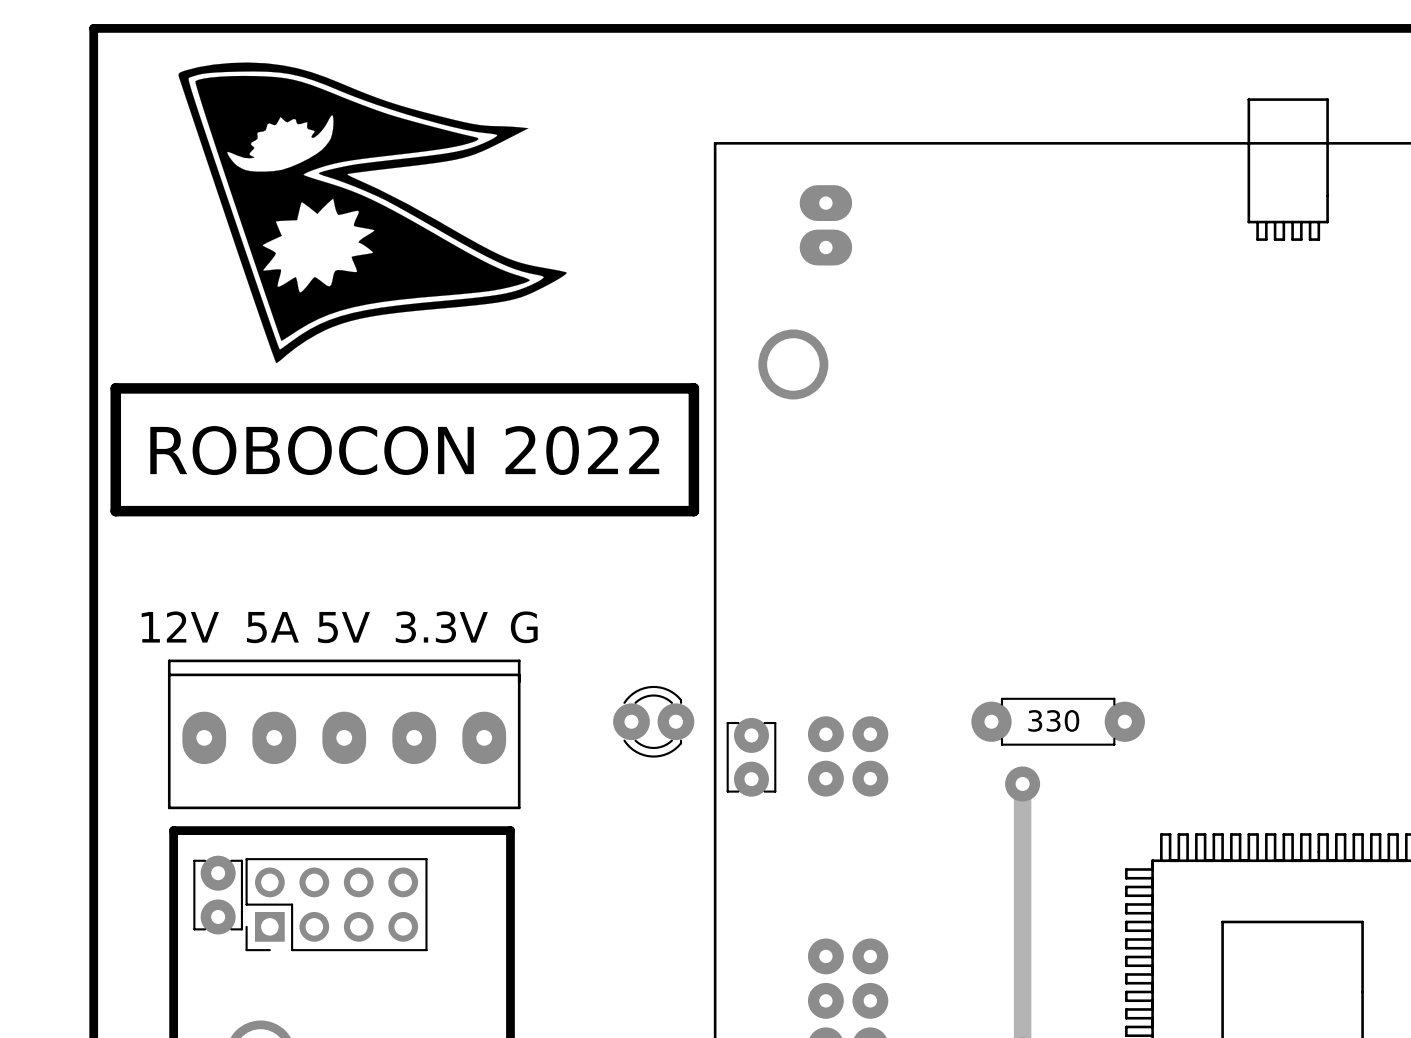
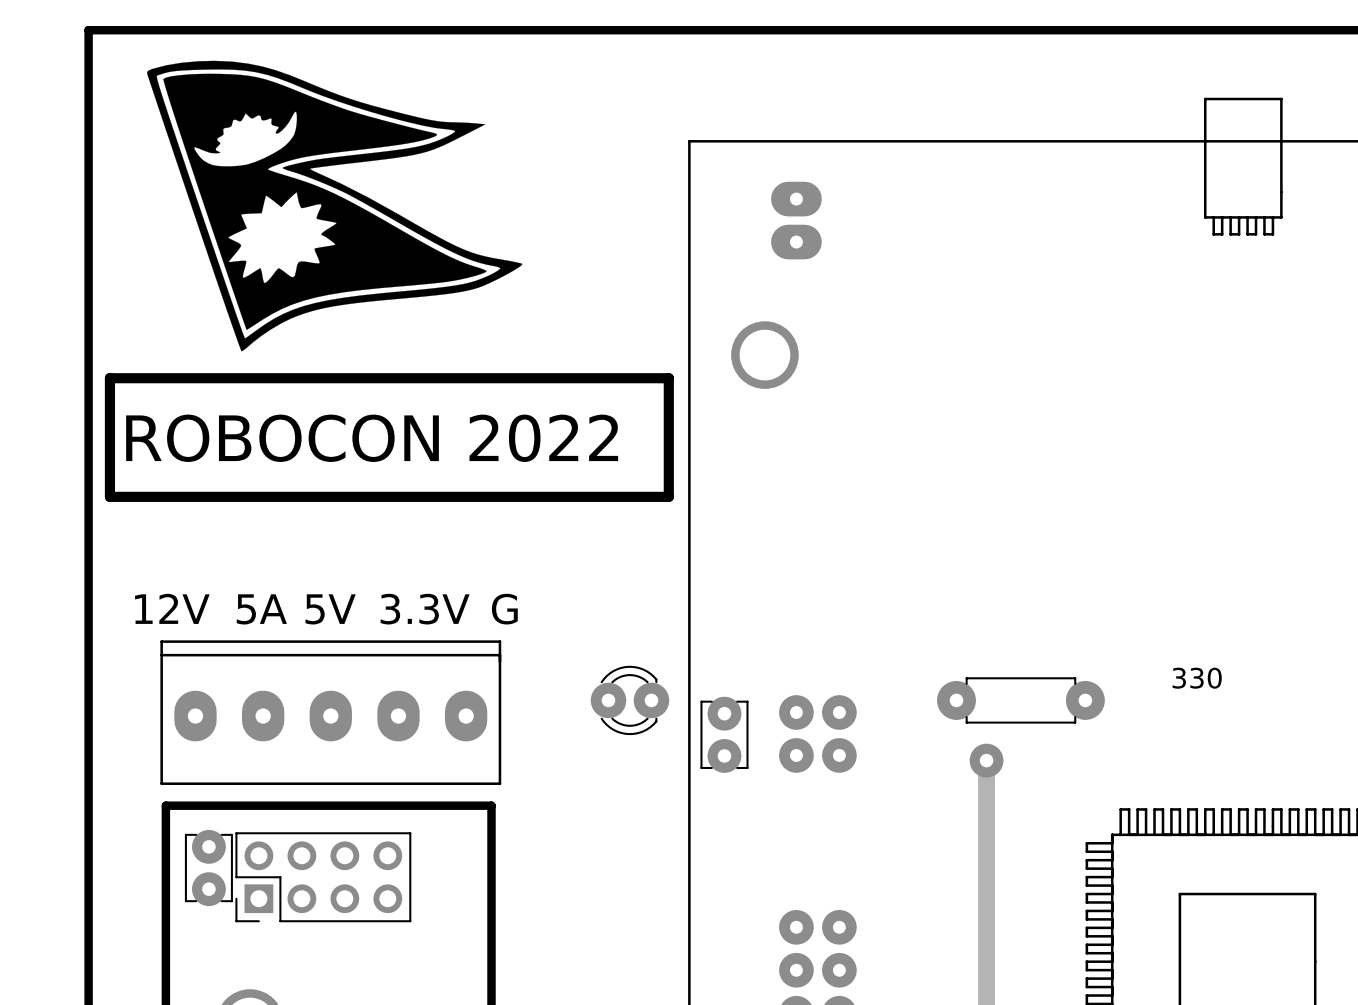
drawing position: (372, 212) -> (334, 206)
text position: ROBOCON 2022 (404, 450) -> ROBOCON 2022 (372, 438)
text position: 330 (1053, 720) -> 330 (1197, 678)

